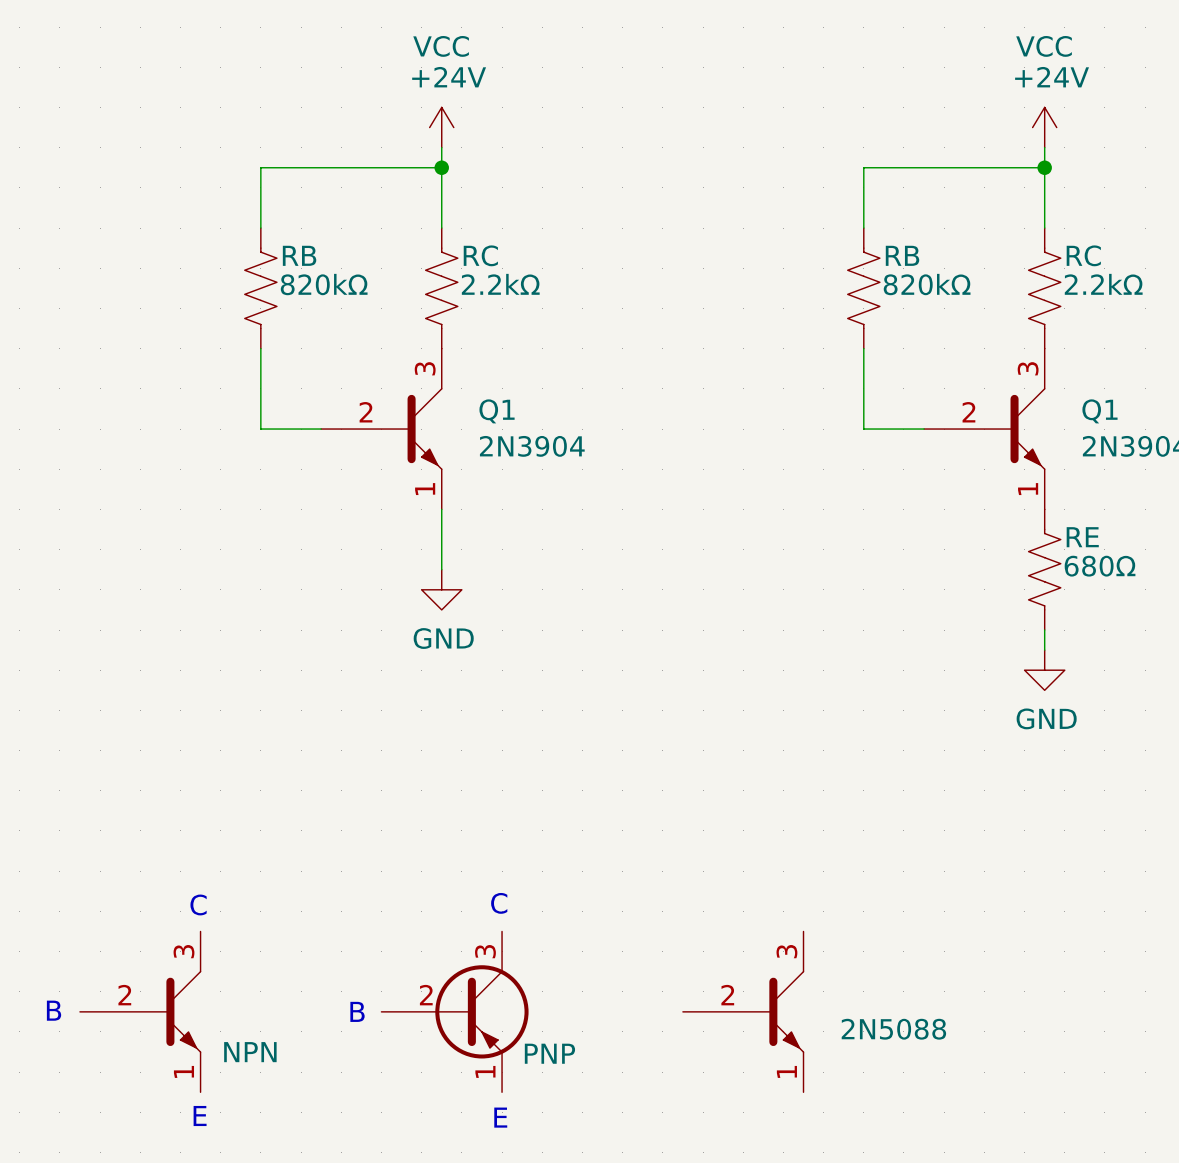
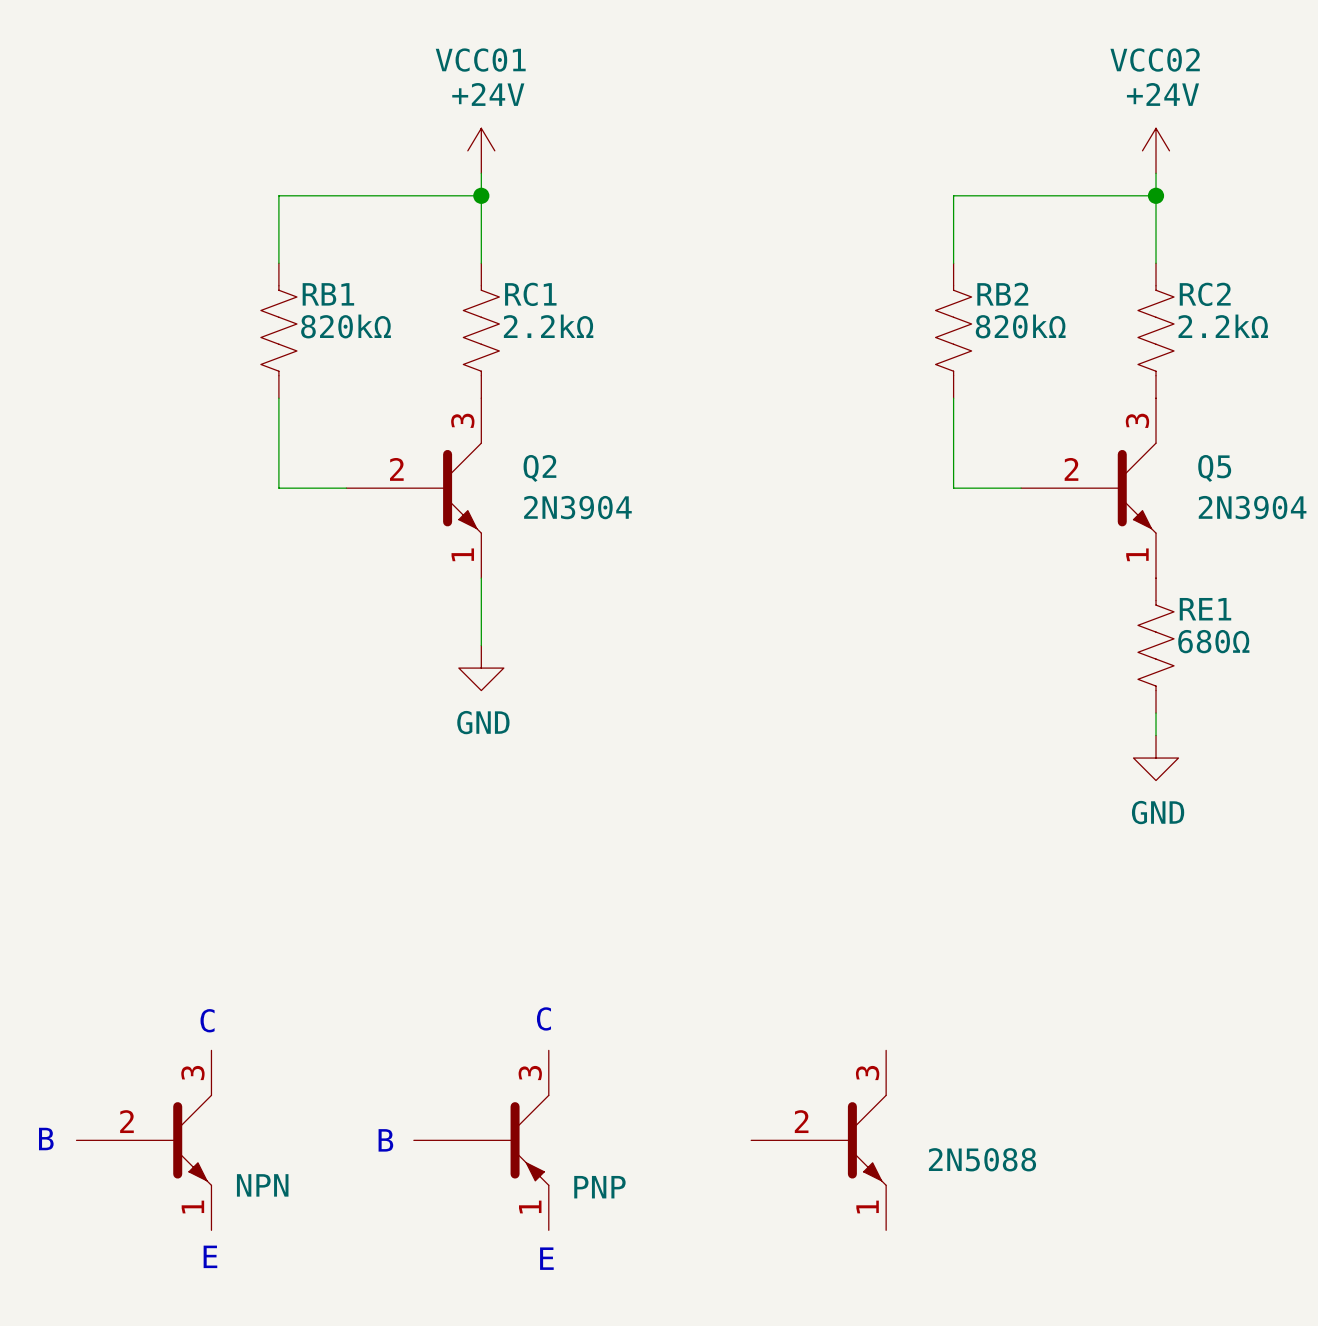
VCC name: VCC (441, 46) -> VCC01 (480, 60)
VCC name: VCC (1044, 46) -> VCC02 (1155, 60)
RB name: RB (299, 255) -> RB1 (328, 294)
RC name: RC (480, 255) -> RC1 (530, 294)
RB name: RB (902, 255) -> RB2 (1002, 294)
RC name: RC (1083, 255) -> RC2 (1205, 294)
Q1 name: Q1 (497, 411) -> Q2 (539, 468)
Q1 name: Q1 (1099, 411) -> Q5 (1214, 468)
RE name: RE (1082, 537) -> RE1 (1205, 609)
part symbol: [381, 931, 529, 1093] -> [413, 1050, 549, 1231]

